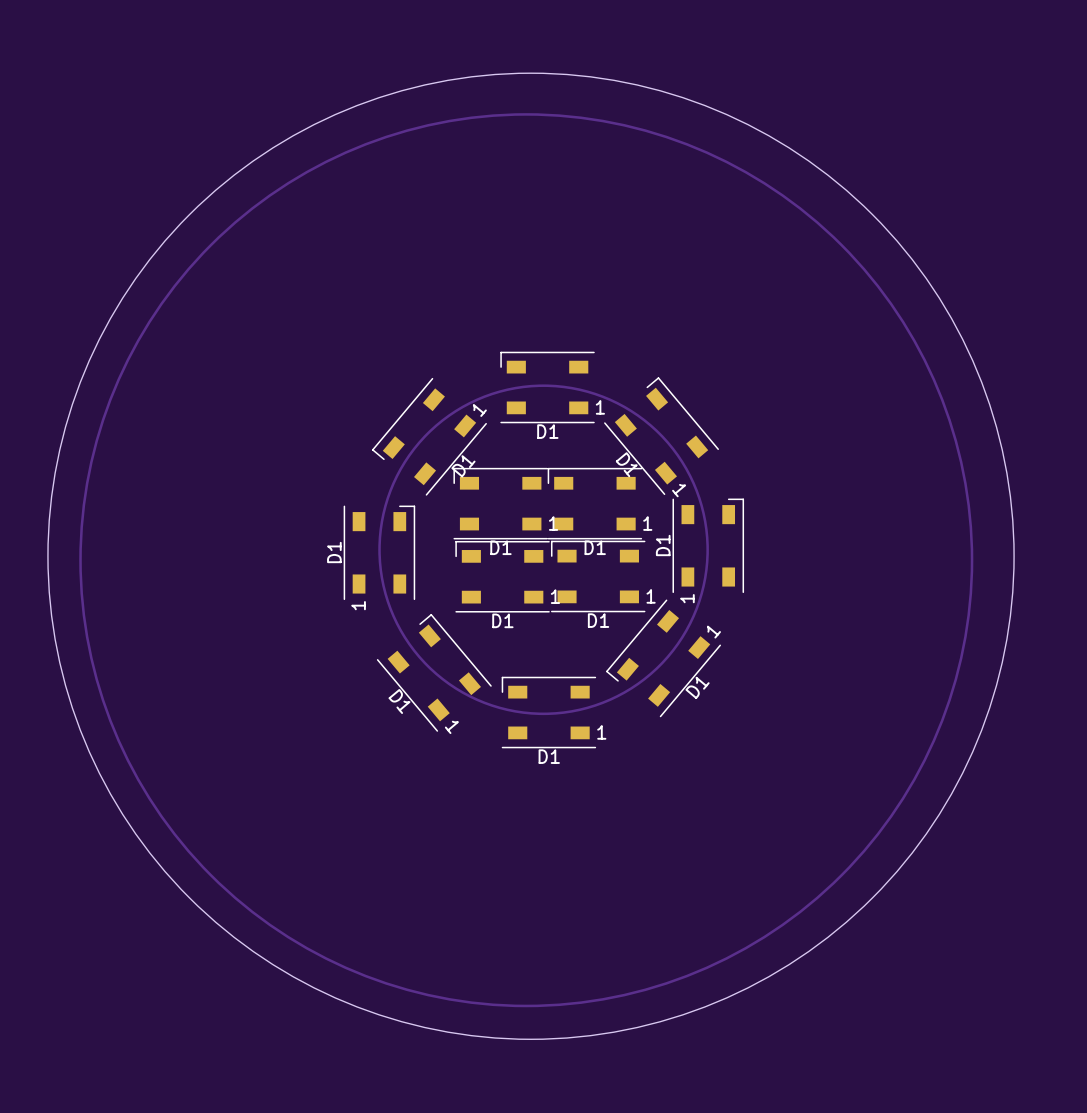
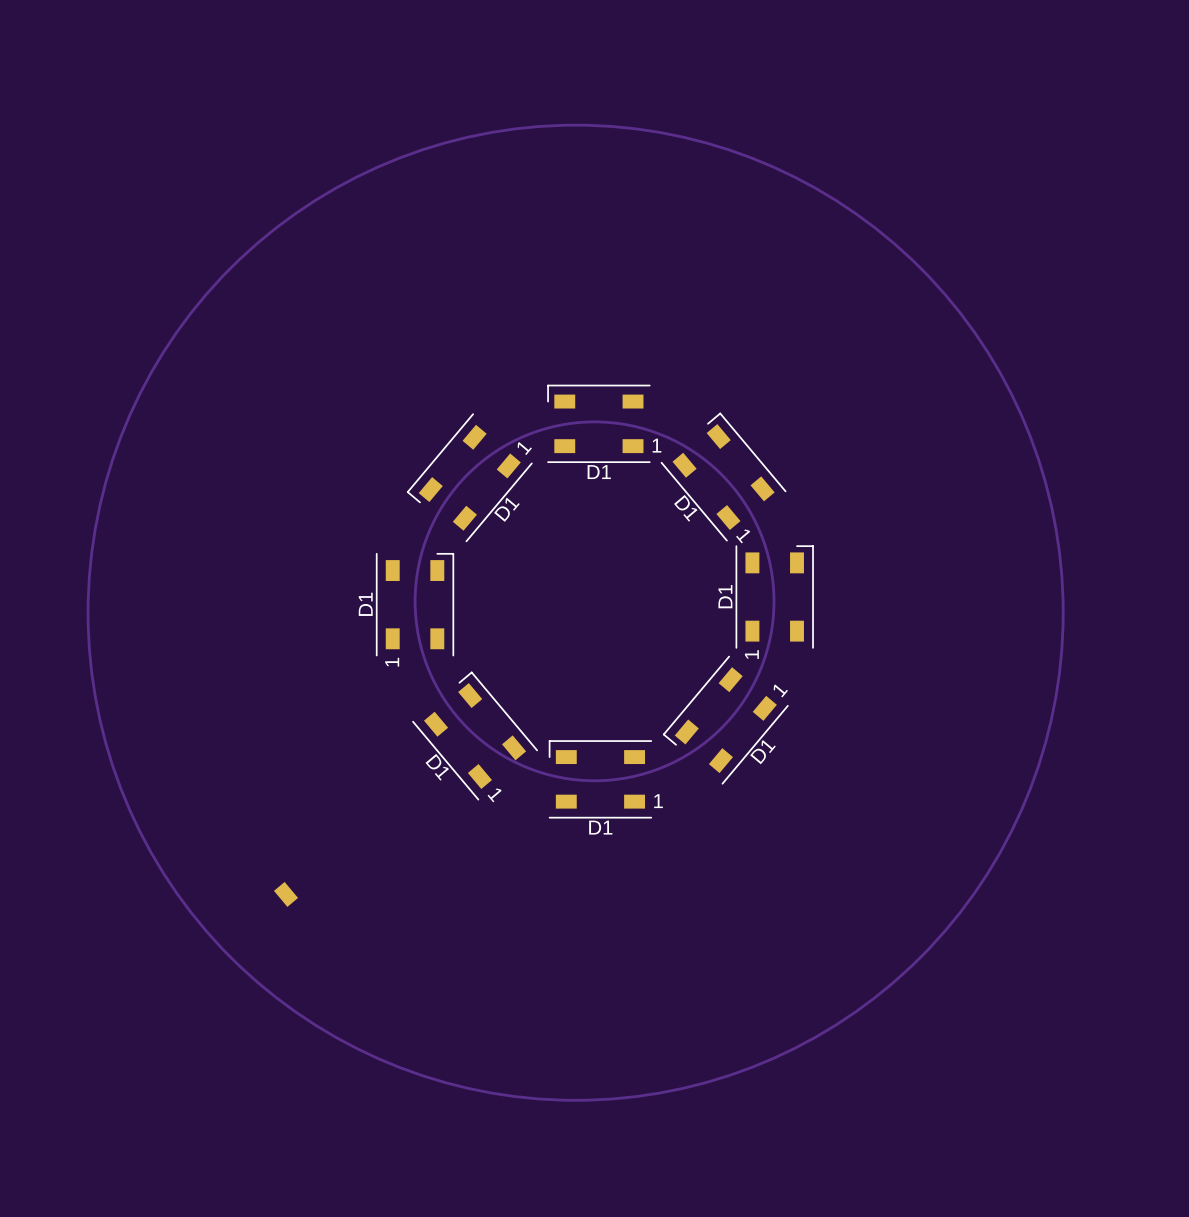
round board edge: [47, 72, 1015, 1040] -> none
D1: (500, 503) -> none
D1: (594, 503) -> none
D1: (502, 576) -> none
D1: (598, 576) -> none
part: none -> (286, 894)

